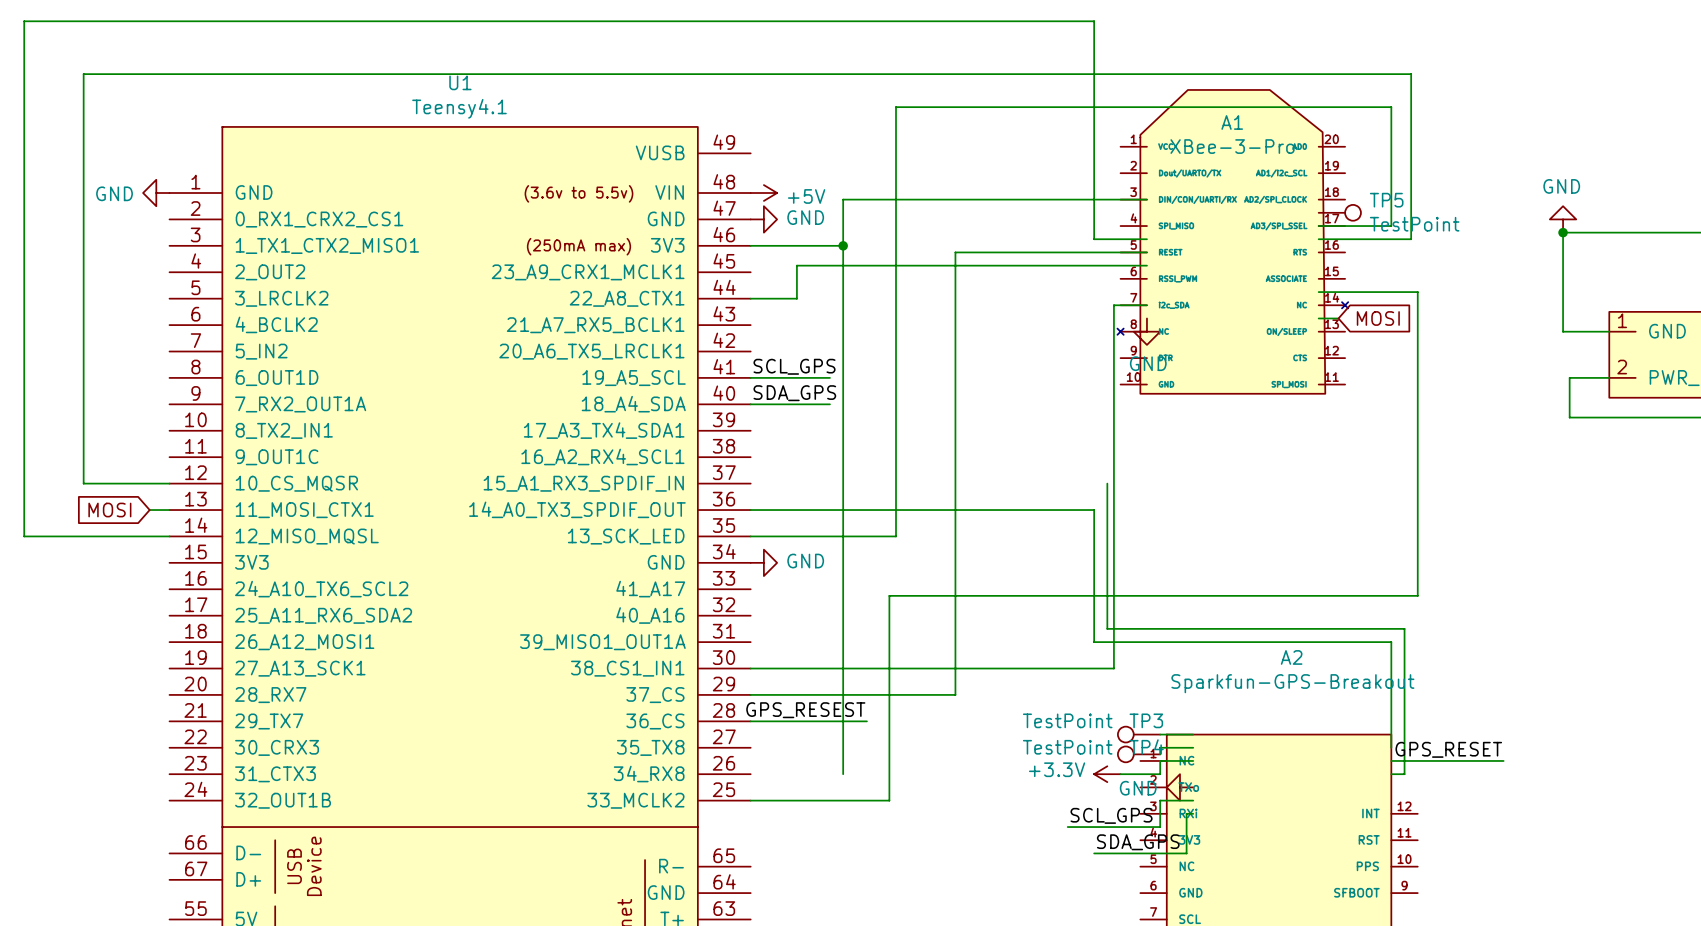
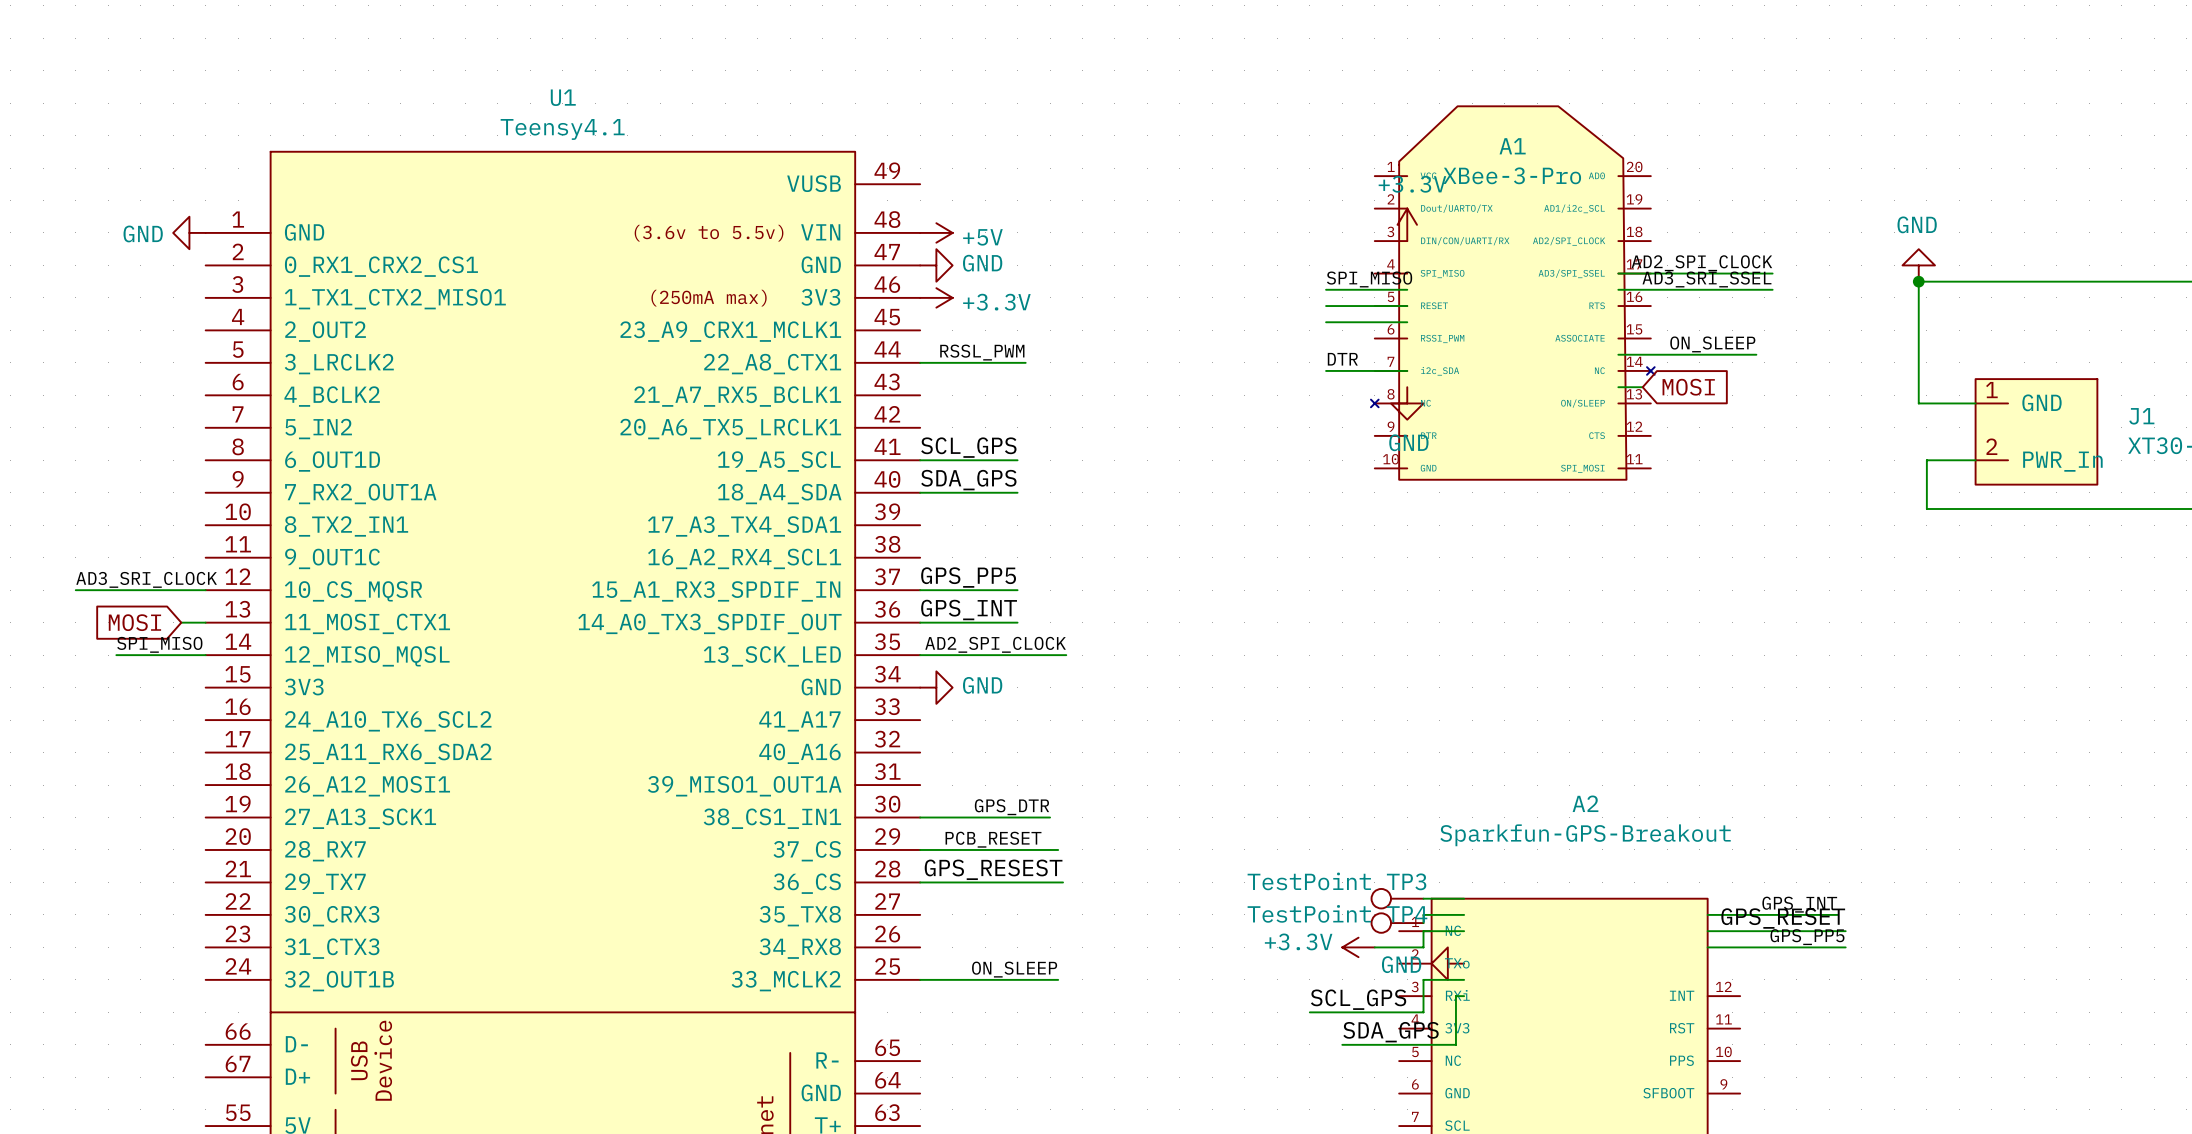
power symbol: none -> +3.3V (1407, 224)
wire: (1146, 199) (843, 199) (843, 774) -> none
TP5: TestPoint (1339, 212) -> none
label: none -> AD2_SPI_CLOCK (1701, 263)
wire: (1391, 226) (1391, 107) (896, 107) (896, 536) (869, 536) -> (1707, 273) (1772, 273)
label: none -> SPI_MISO (1369, 279)
label: none -> AD3_SRI_SSEL (1706, 279)
wire: (1094, 239) (1094, 21) (24, 21) (24, 536) (96, 536) -> (1342, 289) (1326, 289)
wire: (1411, 239) (1411, 74) (83, 74) (83, 483) -> (75, 590) (100, 590)
wire: none -> (1732, 289) (1772, 289)
wire: (750, 245) (843, 245) -> none
power symbol: none -> +3.3V (936, 297)
junction: (843, 245) -> none
wire: (1080, 252) (955, 252) (955, 694) (862, 694) -> none
wire: (1080, 265) (796, 265) (796, 298) -> (1025, 362) (976, 362)
label: none -> ON_SLEEP (1712, 344)
label: none -> RSSL_PWM (982, 352)
wire: (1417, 292) (1417, 595) (889, 595) (889, 800) (862, 800) -> (1740, 354) (1756, 354)
label: none -> DTR (1342, 359)
wire: (1113, 305) (1113, 668) (856, 668) -> (1366, 370) (1326, 370)
label: none -> GPS_PP5 (968, 577)
label: none -> AD3_SRI_CLOCK (146, 579)
wire: none -> (920, 590) (1017, 590)
wire: (1107, 483) (1107, 628) (1404, 628) (1404, 774) -> (1845, 947) (1723, 947)
label: none -> GPS_INT (969, 609)
wire: (829, 510) (1094, 510) (1094, 642) (1391, 642) (1391, 747) -> (1837, 914) (1707, 914)
label: none -> SPI_MISO (159, 644)
label: none -> AD2_SPI_CLOCK (995, 644)
label: none -> GPS_DTR (1011, 807)
label: none -> PCB_RESET (993, 839)
label: none -> GPS_INT (1799, 904)
label: none -> GPS_PP5 (1807, 937)
label: none -> ON_SLEEP (1014, 969)

